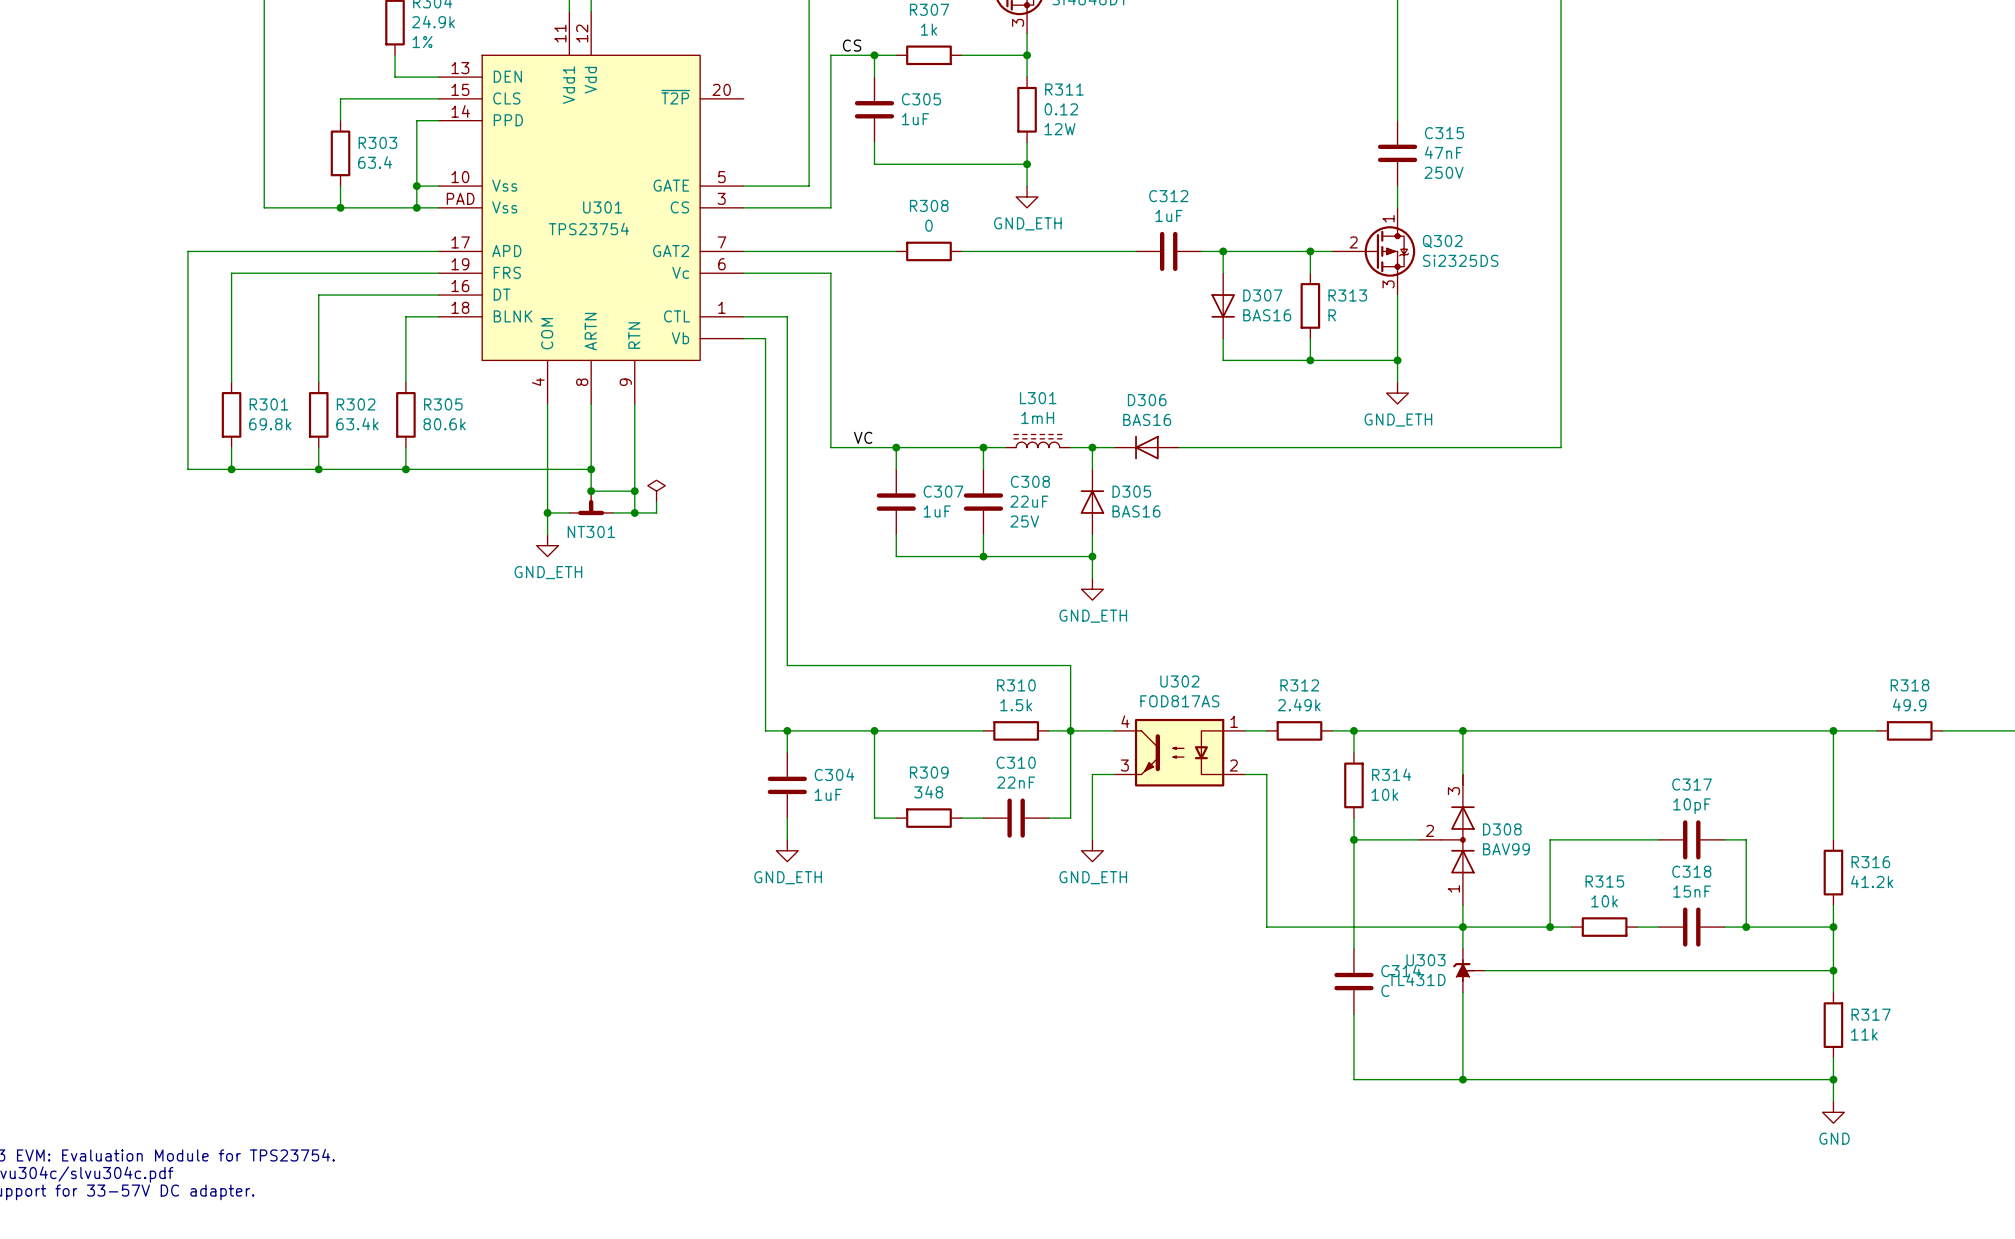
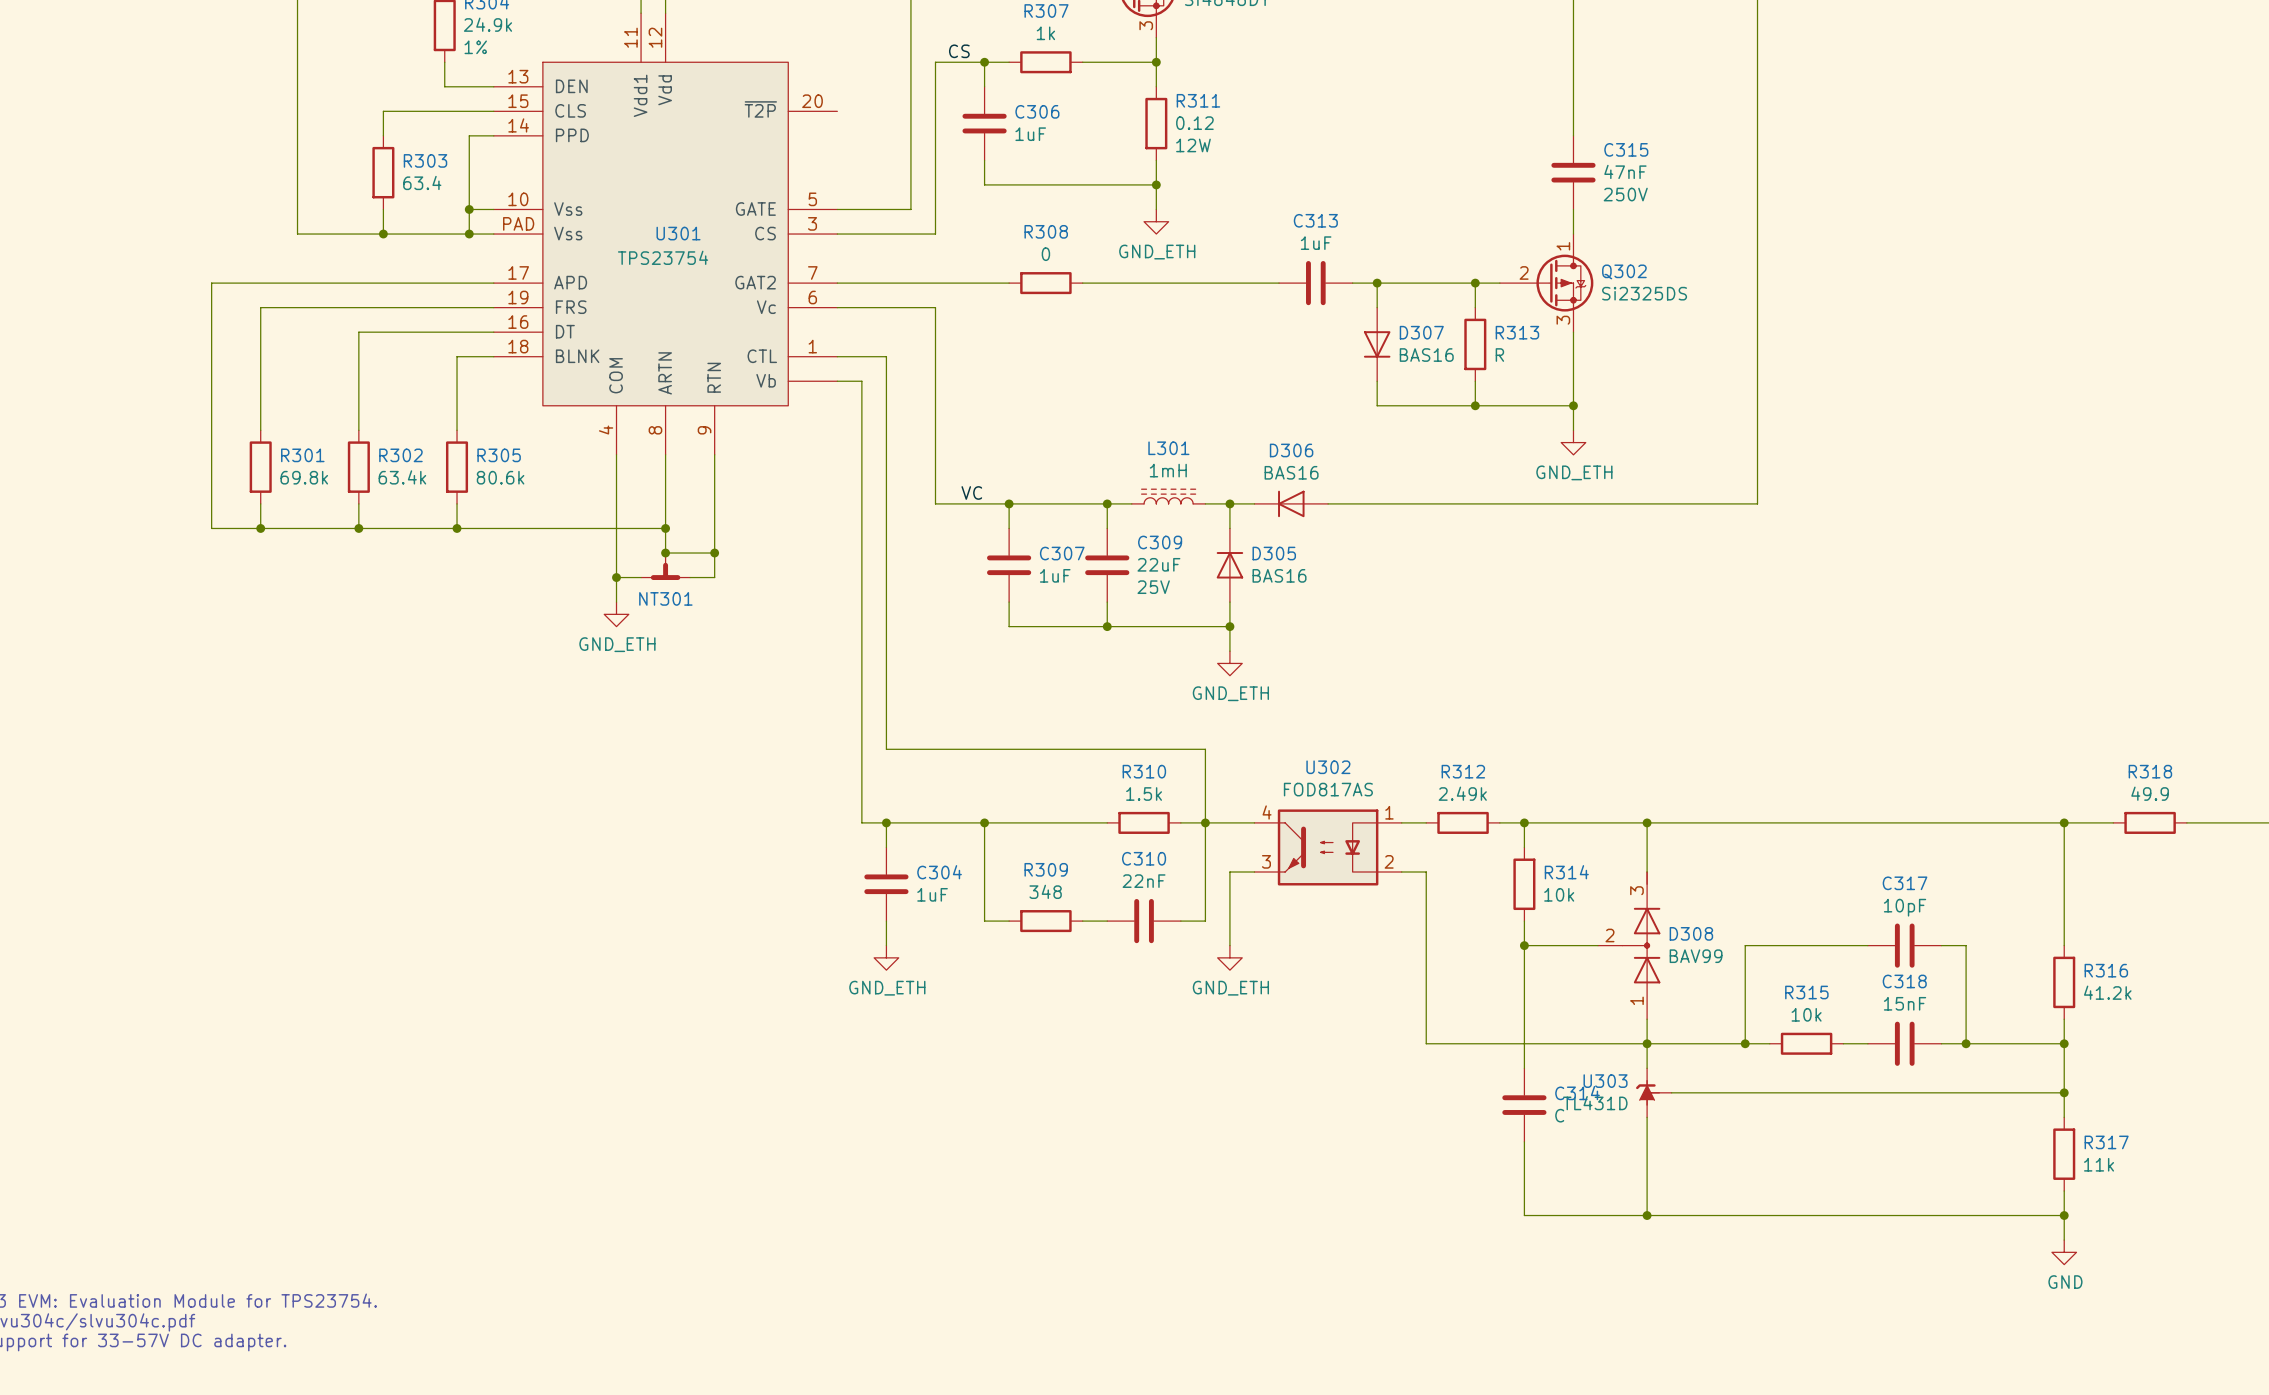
C305 name: C305 (921, 99) -> C306 (1037, 111)
C312 name: C312 (1168, 196) -> C313 (1315, 220)
C308 name: C308 (1030, 481) -> C309 (1160, 542)
power symbol: (656, 491) -> none
wire: (656, 502) (656, 512) (634, 512) -> none
junction: (634, 512) -> none

